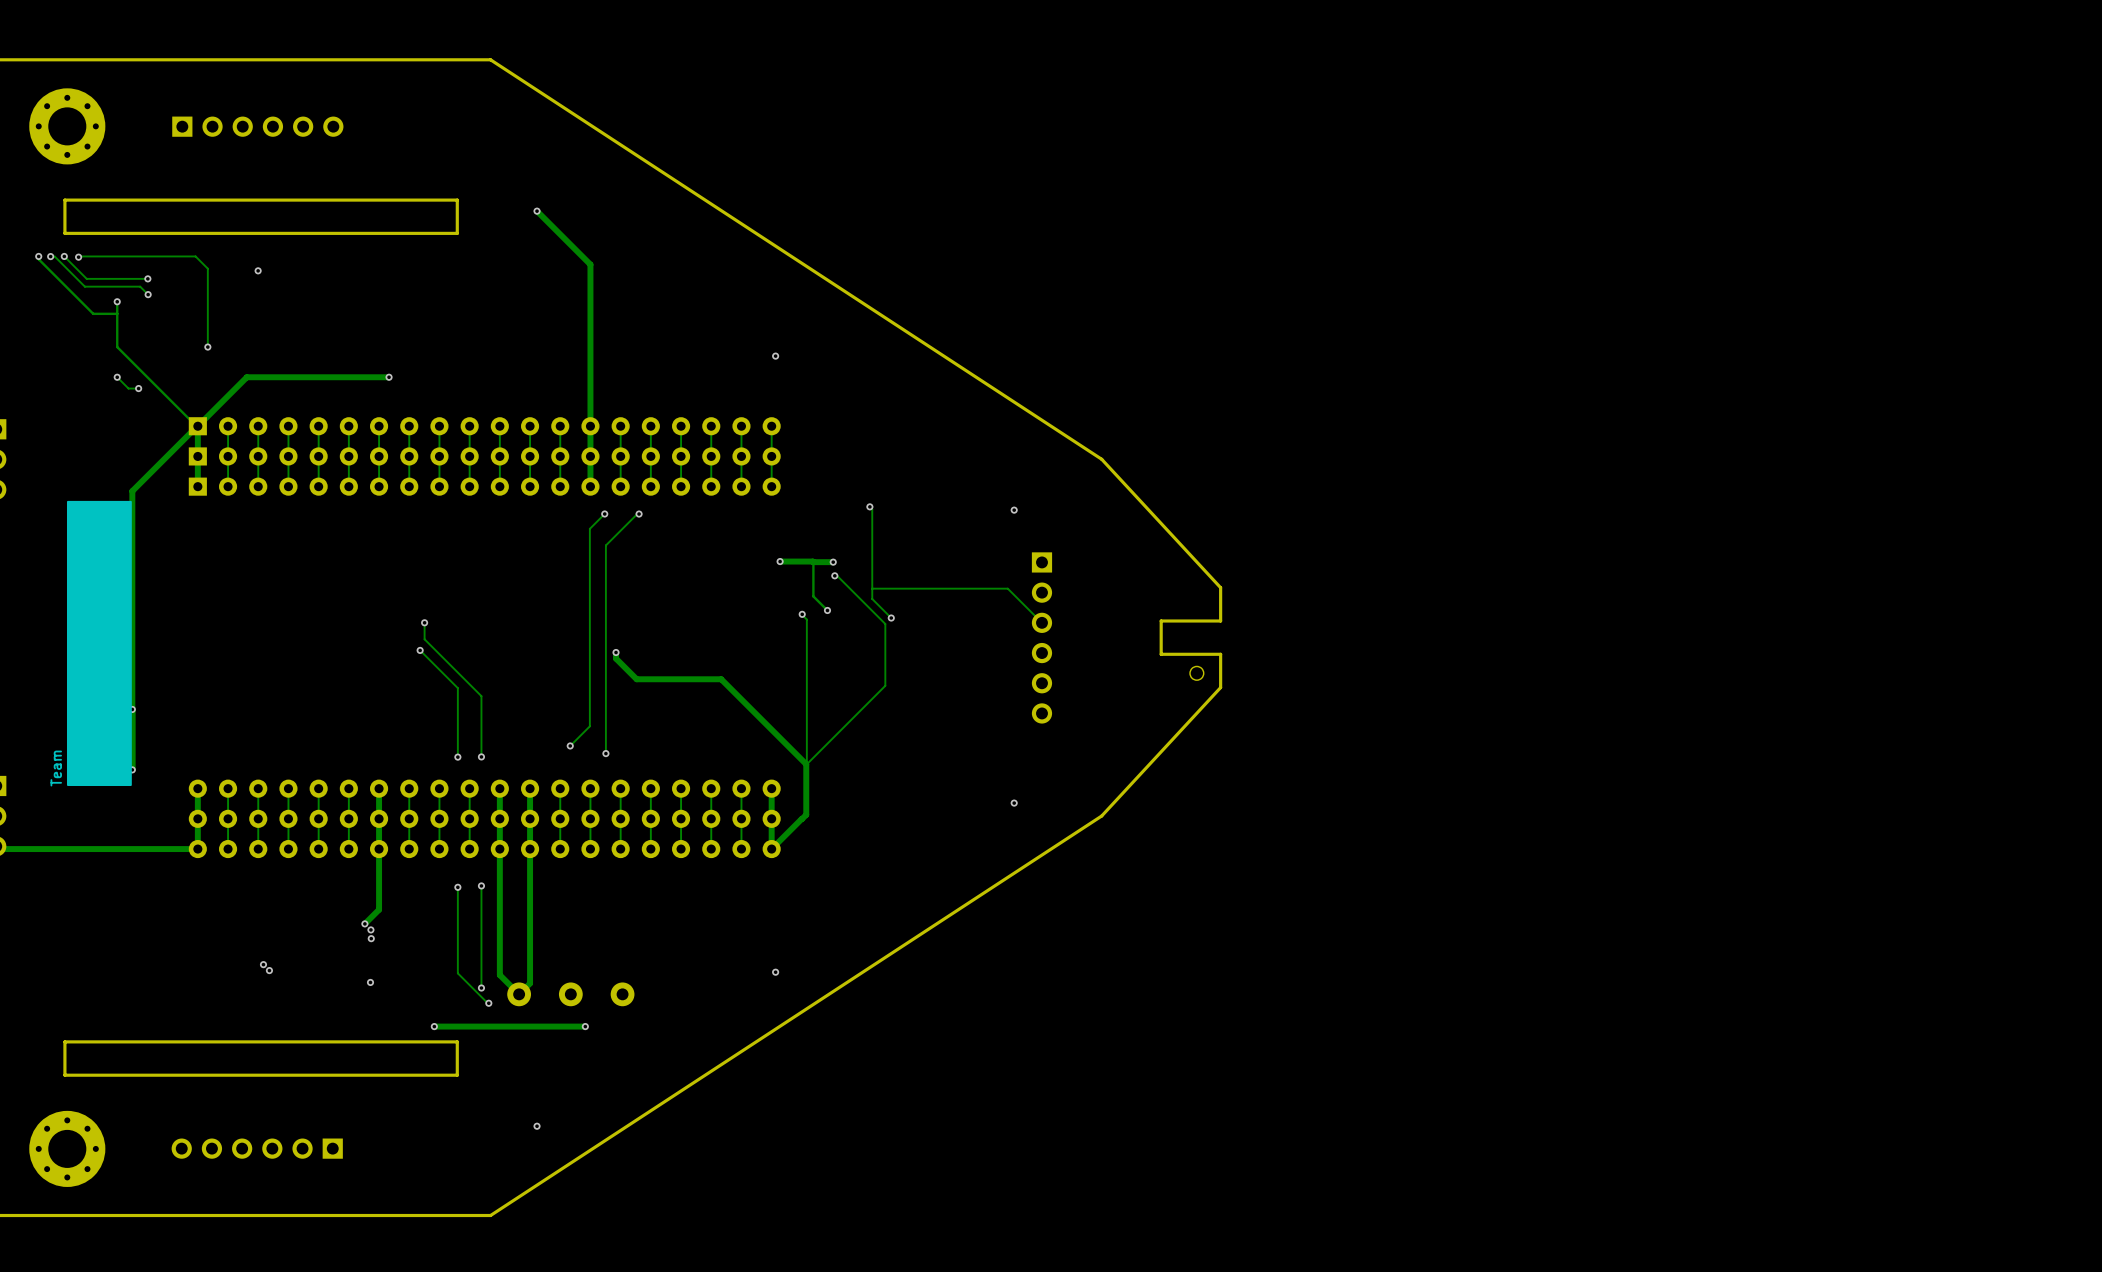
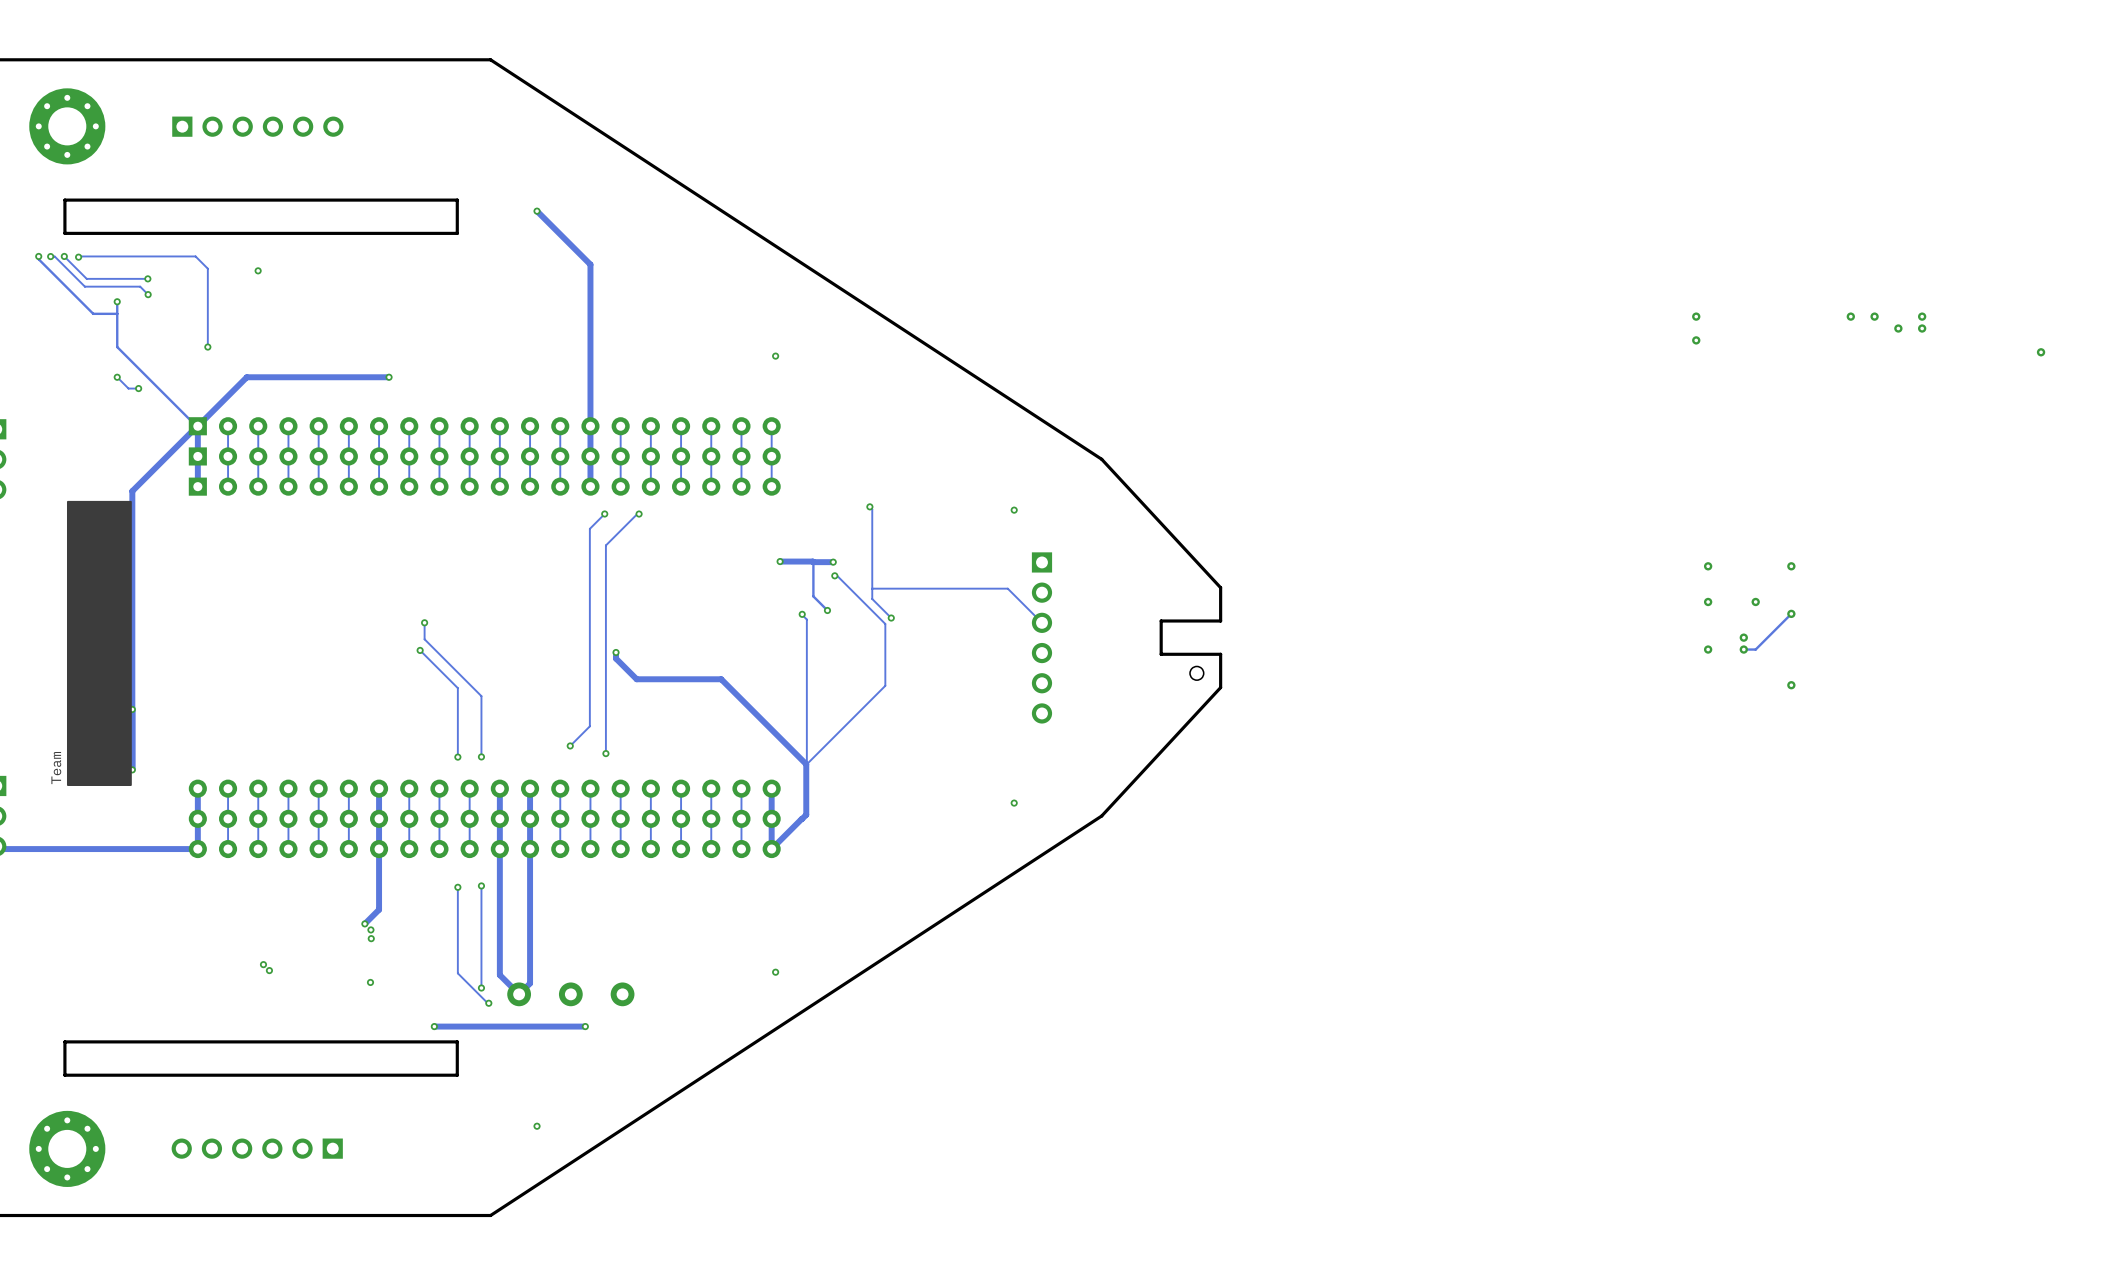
via: none -> (1696, 316)
via: none -> (1850, 316)
via: none -> (1874, 316)
via: none -> (1922, 316)
via: none -> (1898, 328)
via: none -> (1922, 328)
via: none -> (1696, 340)
via: none -> (2041, 352)
via: none -> (1708, 566)
via: none -> (1791, 566)
via: none -> (1708, 601)
via: none -> (1755, 601)
track: none -> (1791, 613) (1755, 649) (1743, 649)
via: none -> (1791, 613)
via: none -> (1743, 637)
via: none -> (1708, 649)
via: none -> (1743, 649)
via: none -> (1791, 685)

